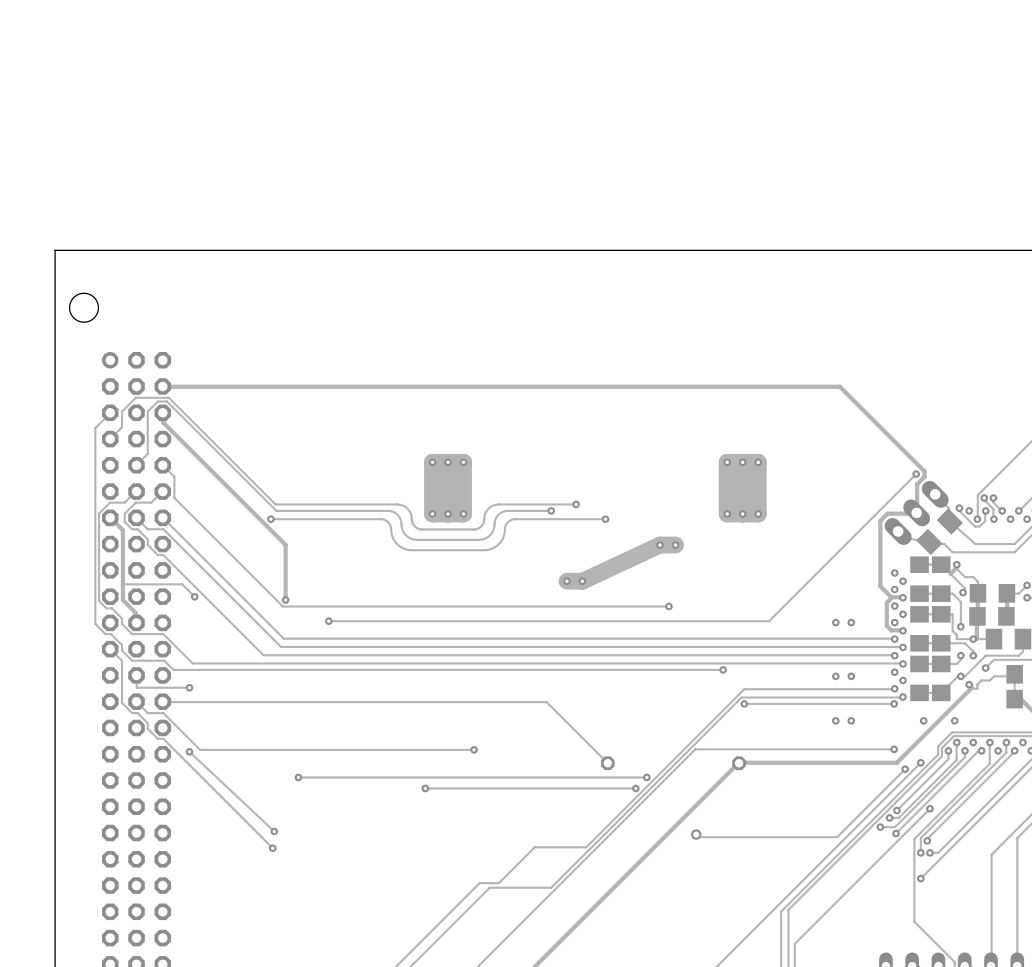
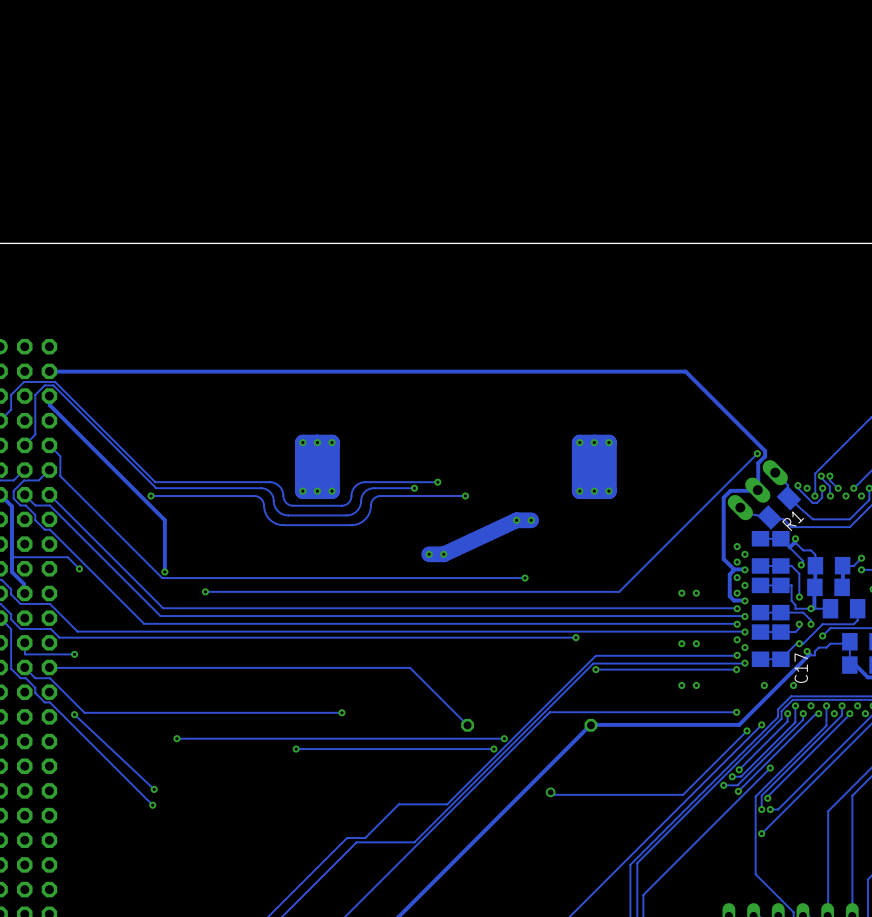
R1 name: none -> R1 (793, 521)
C17 name: none -> C17 (801, 668)

